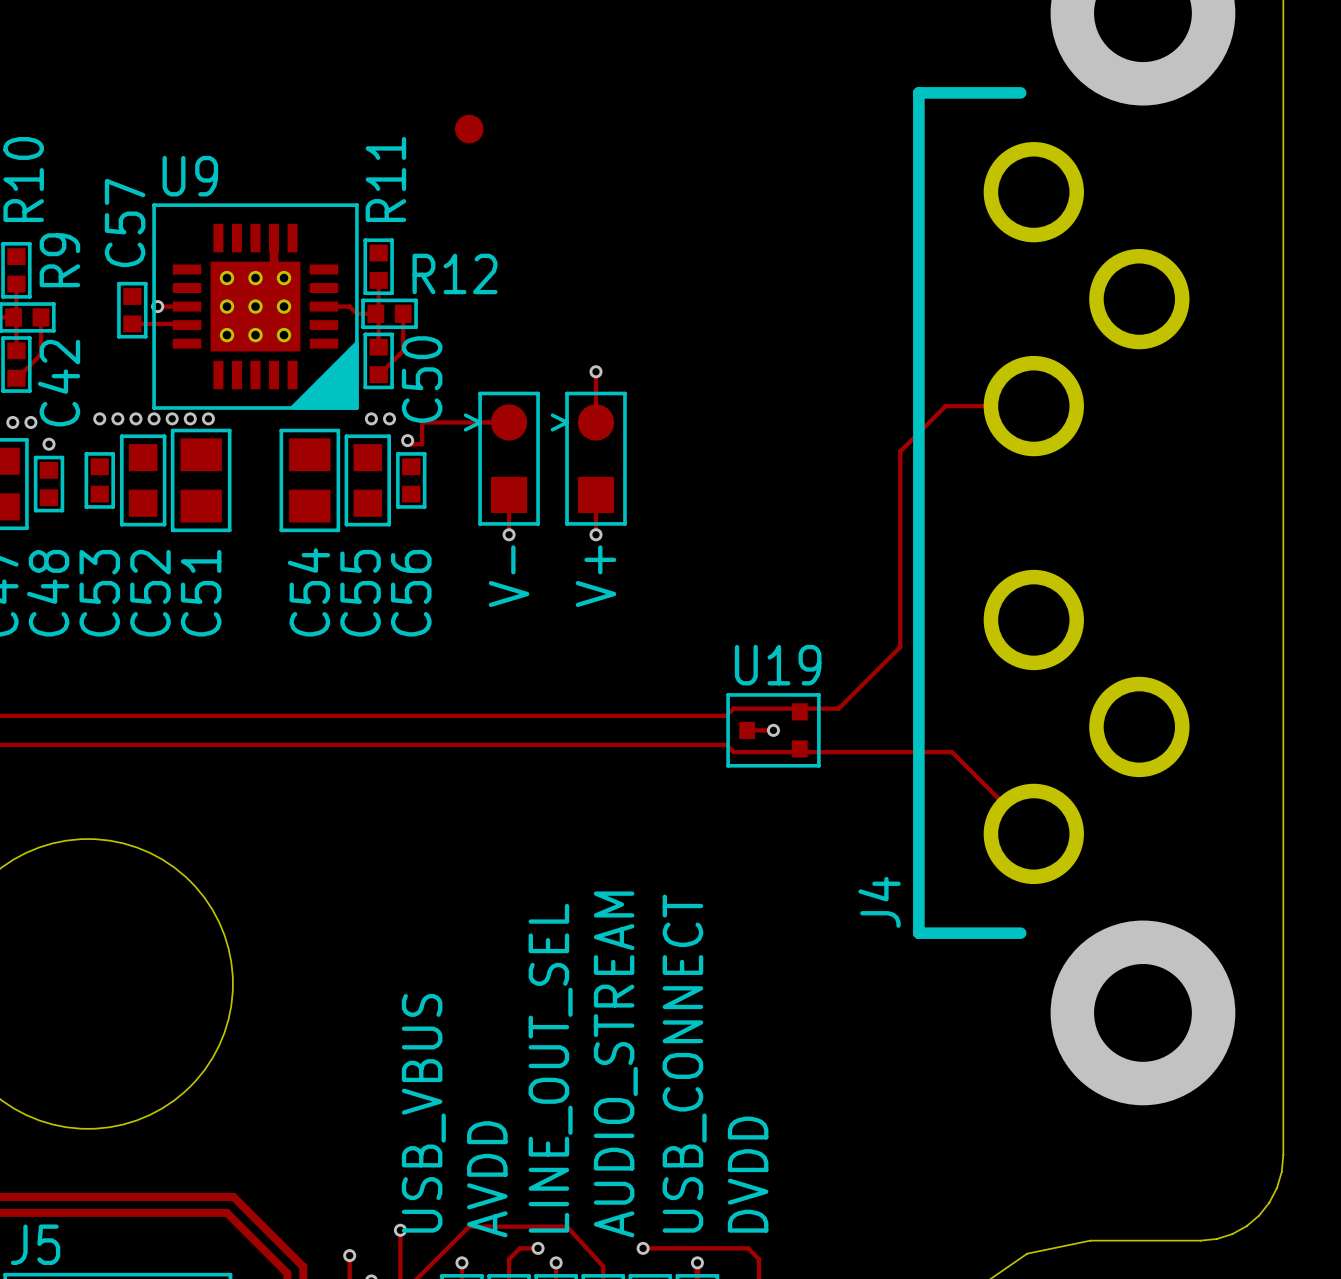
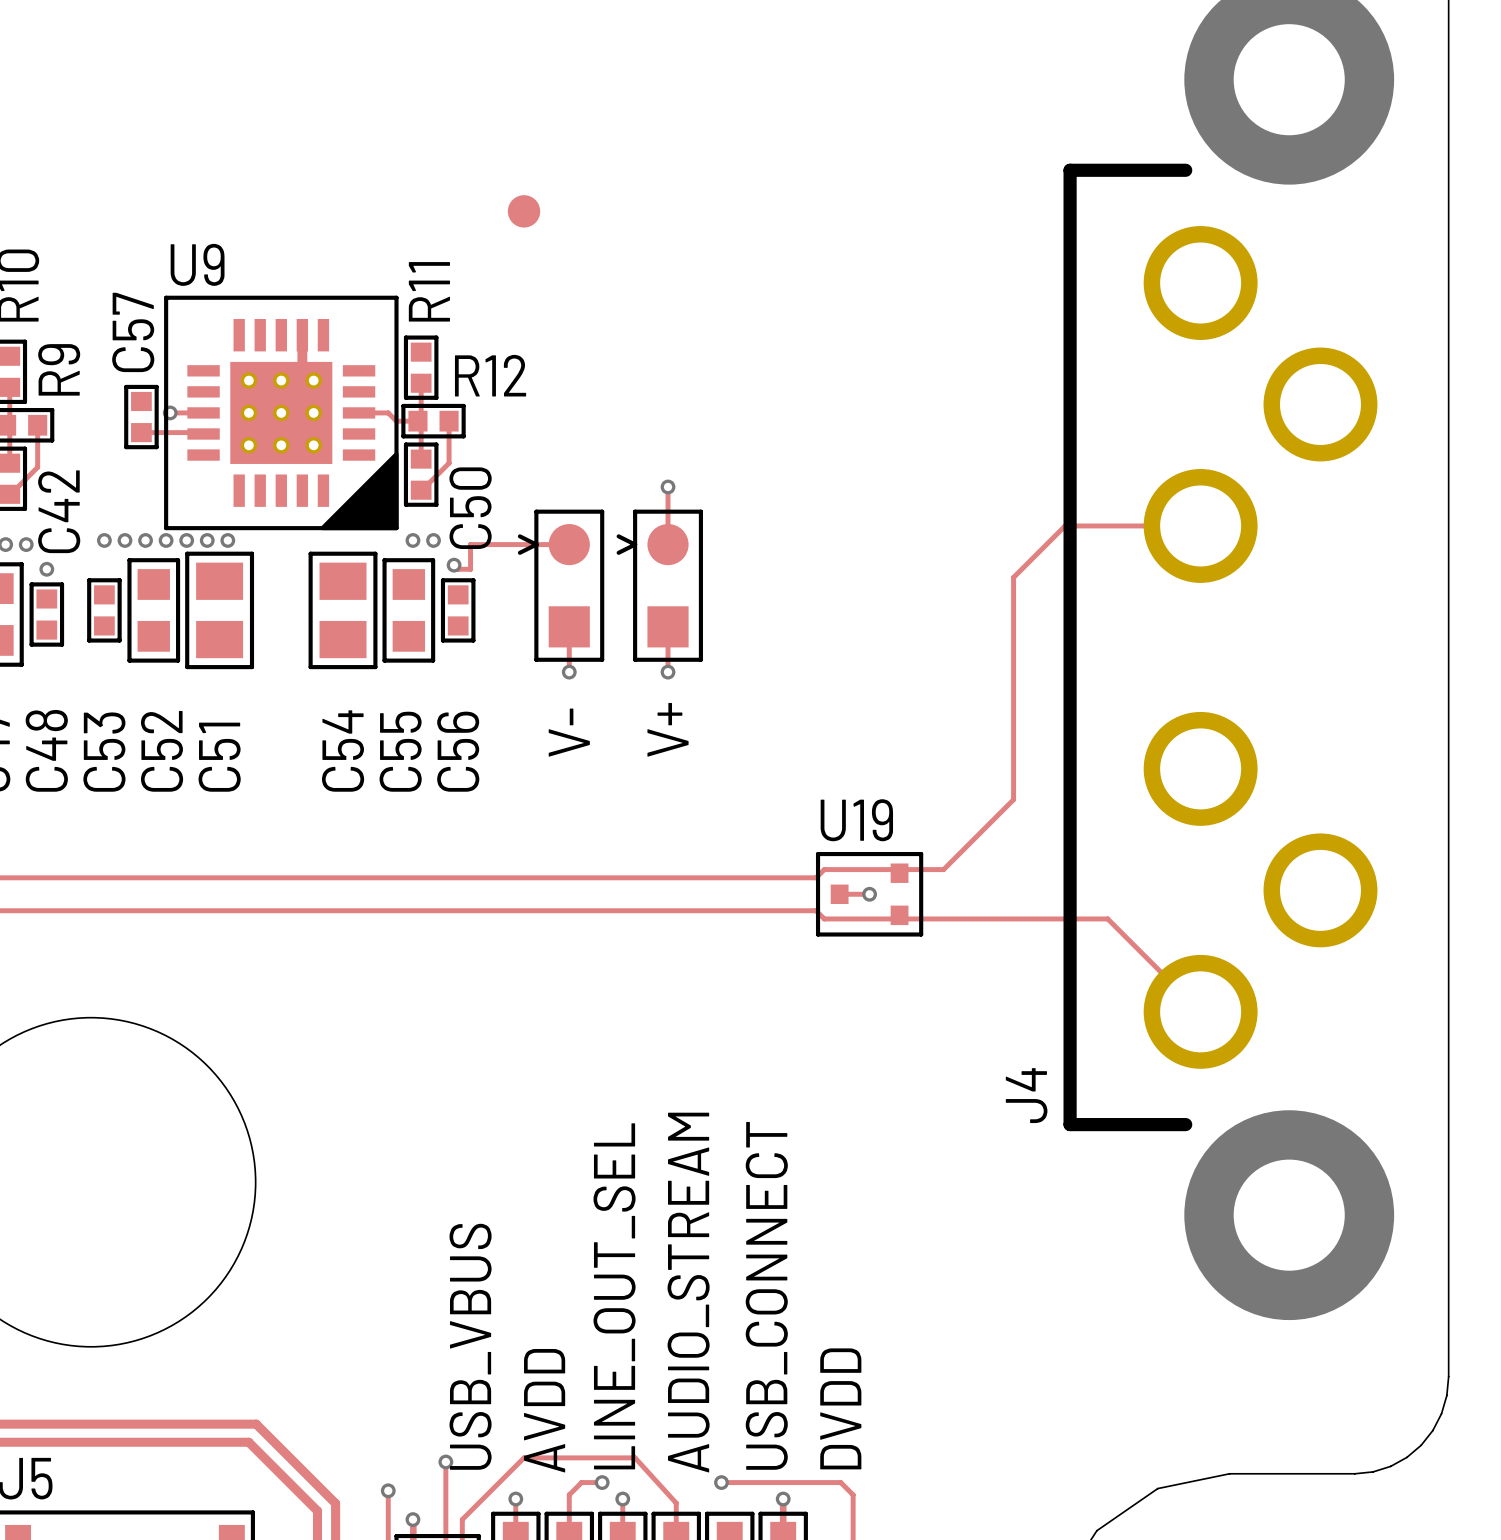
J4 position: (1051, 513) -> (1220, 647)
track: (952, 752) (1033, 833) -> (1072, 918) (1107, 918) (1200, 1011)

